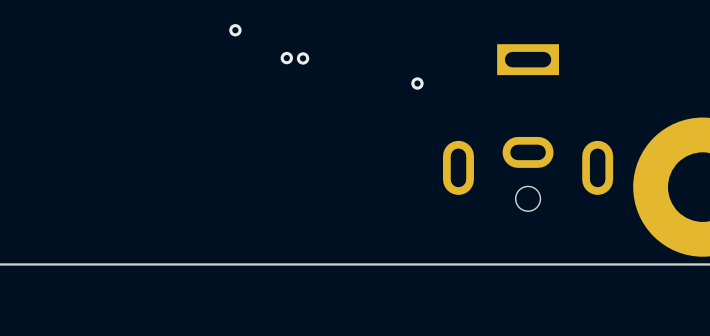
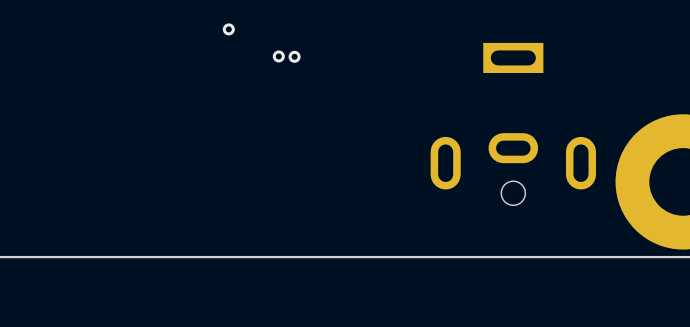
via: (417, 83) -> none

